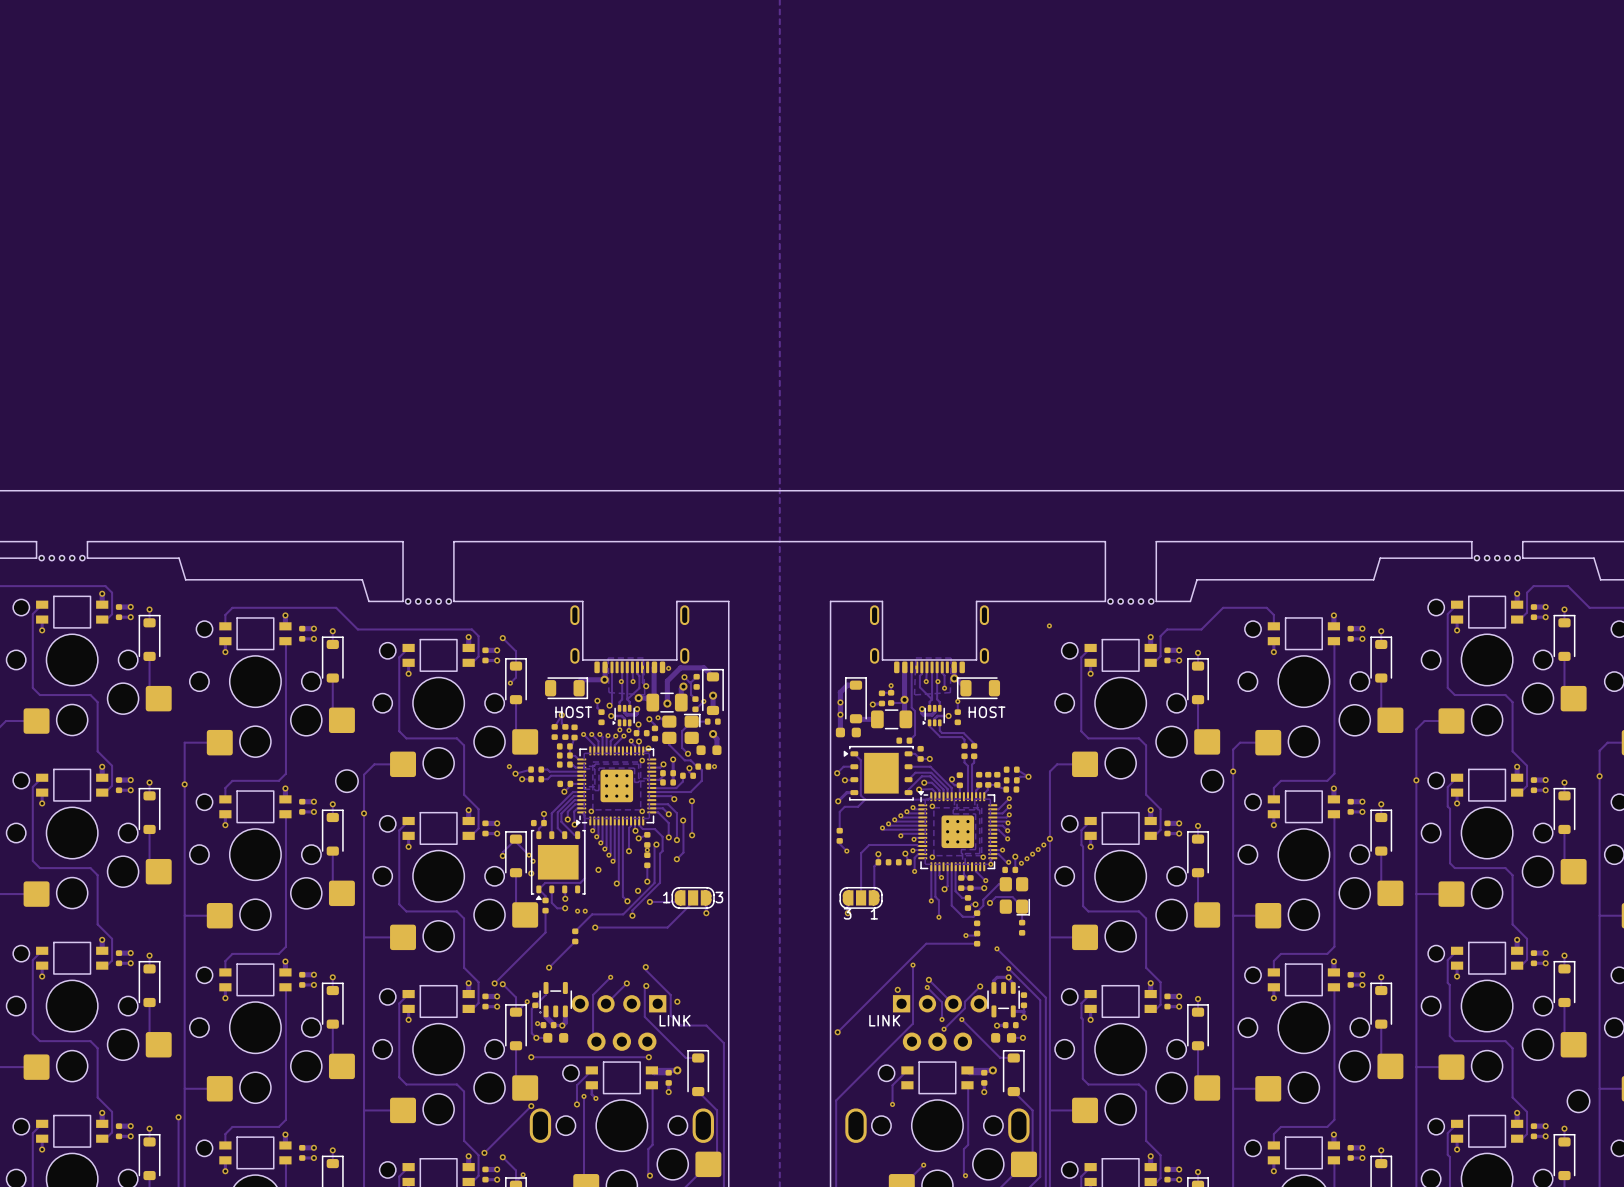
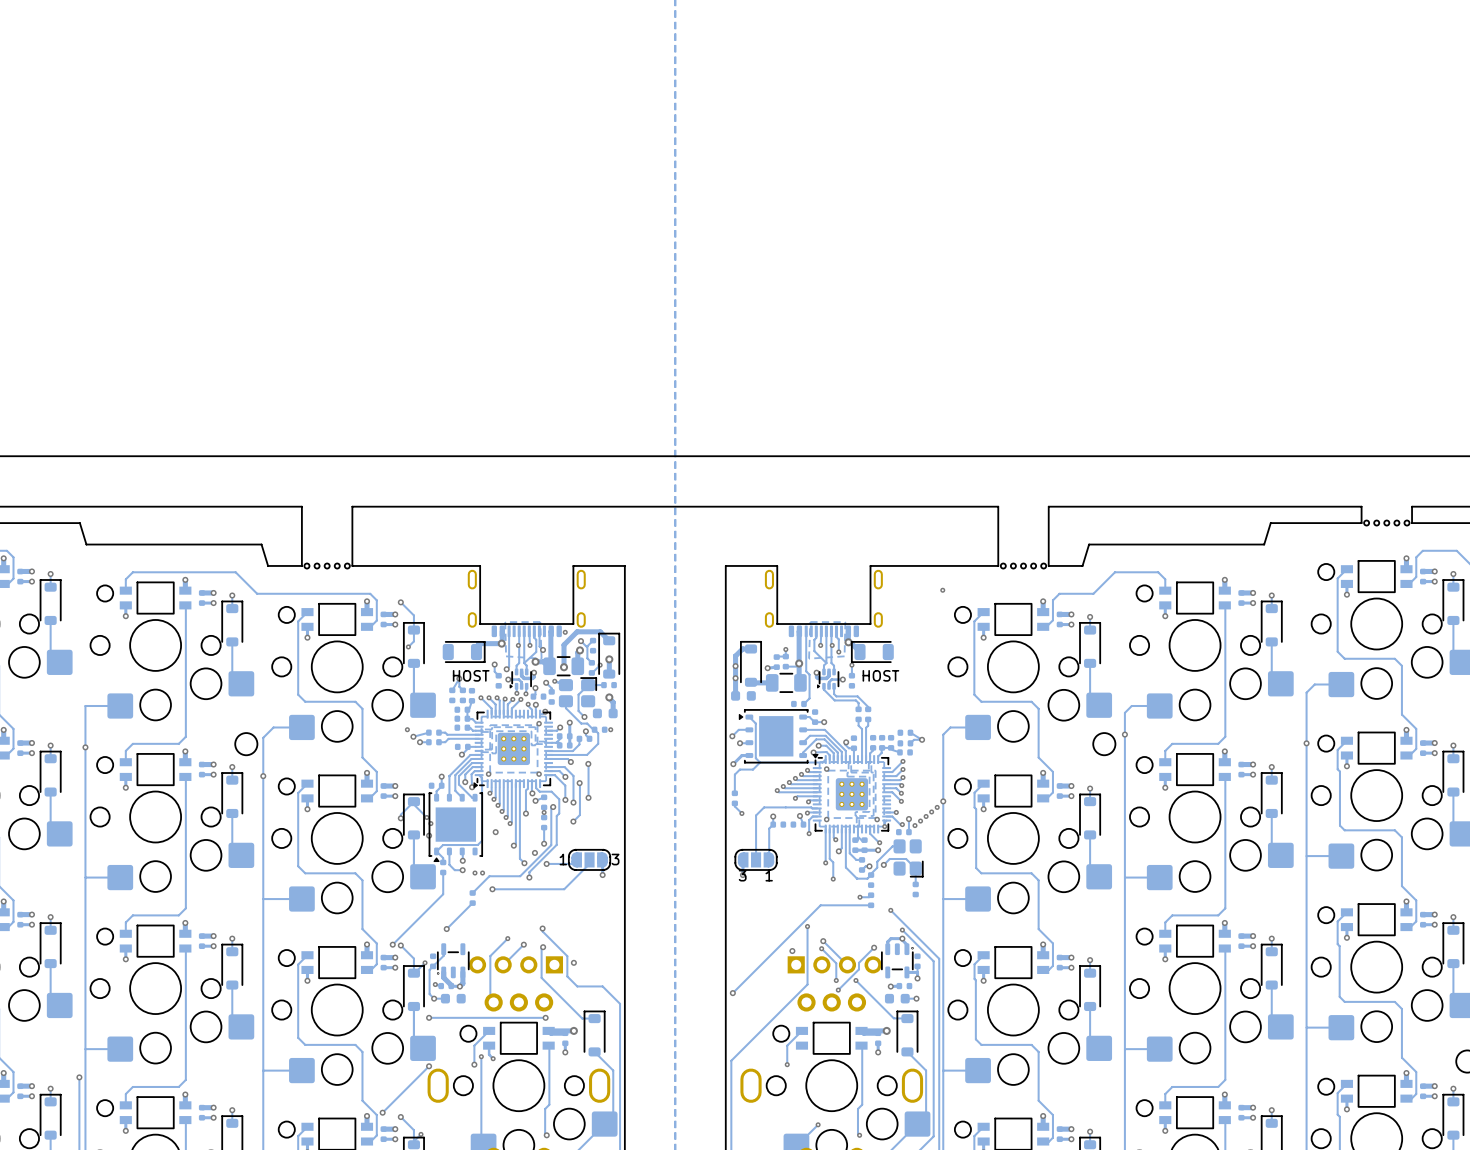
text: LINK (675, 1020) -> none
text: LINK (884, 1020) -> none

